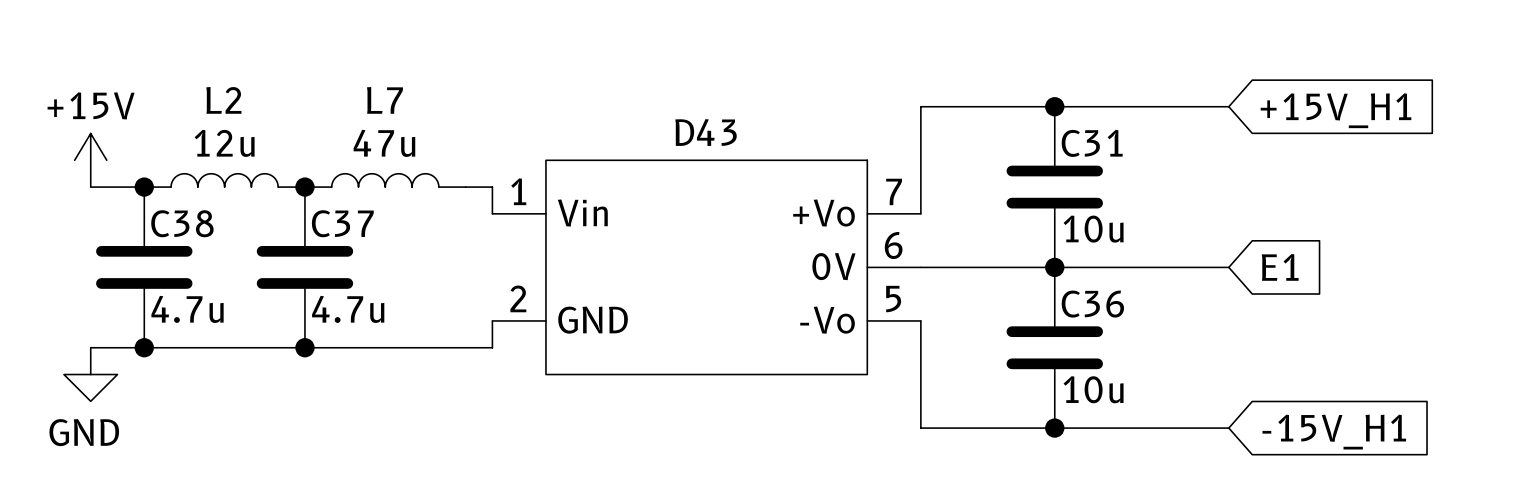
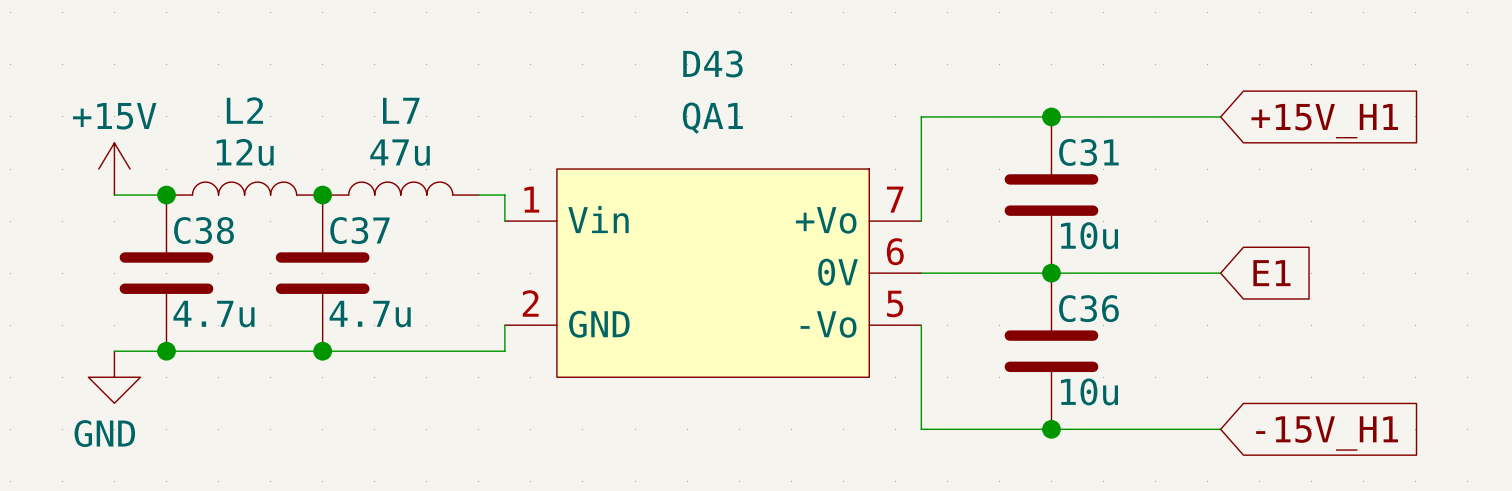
D43 value: none -> QA1 (712, 118)
D43 name position: D43 (706, 132) -> D43 (712, 63)

